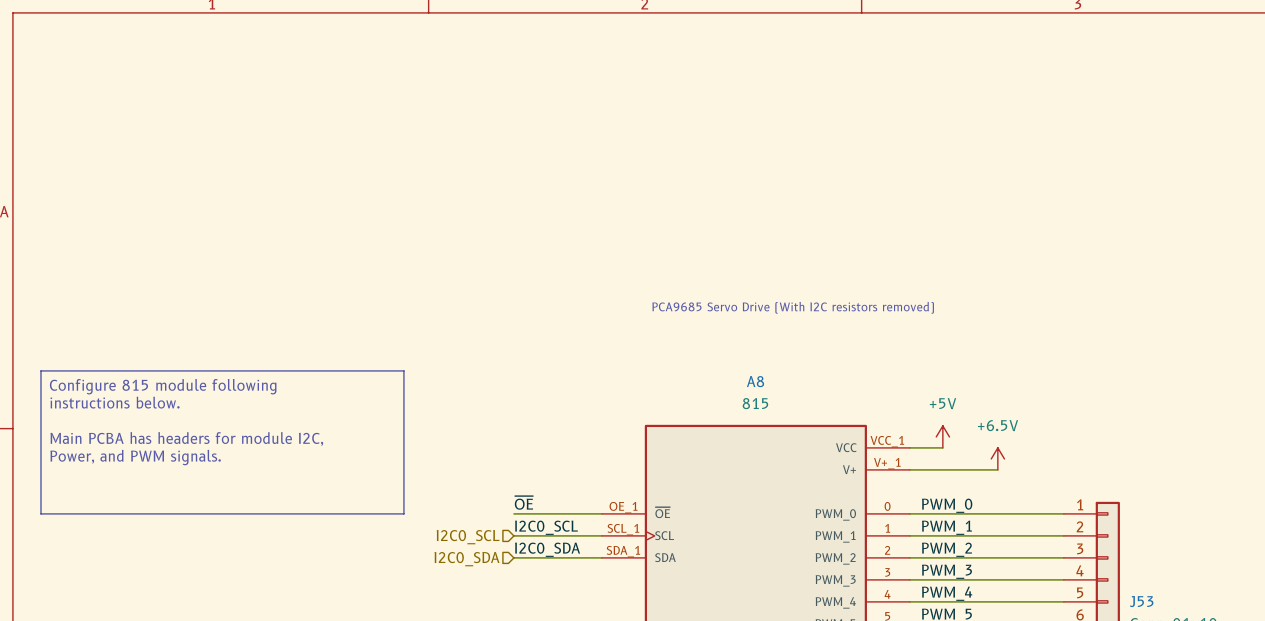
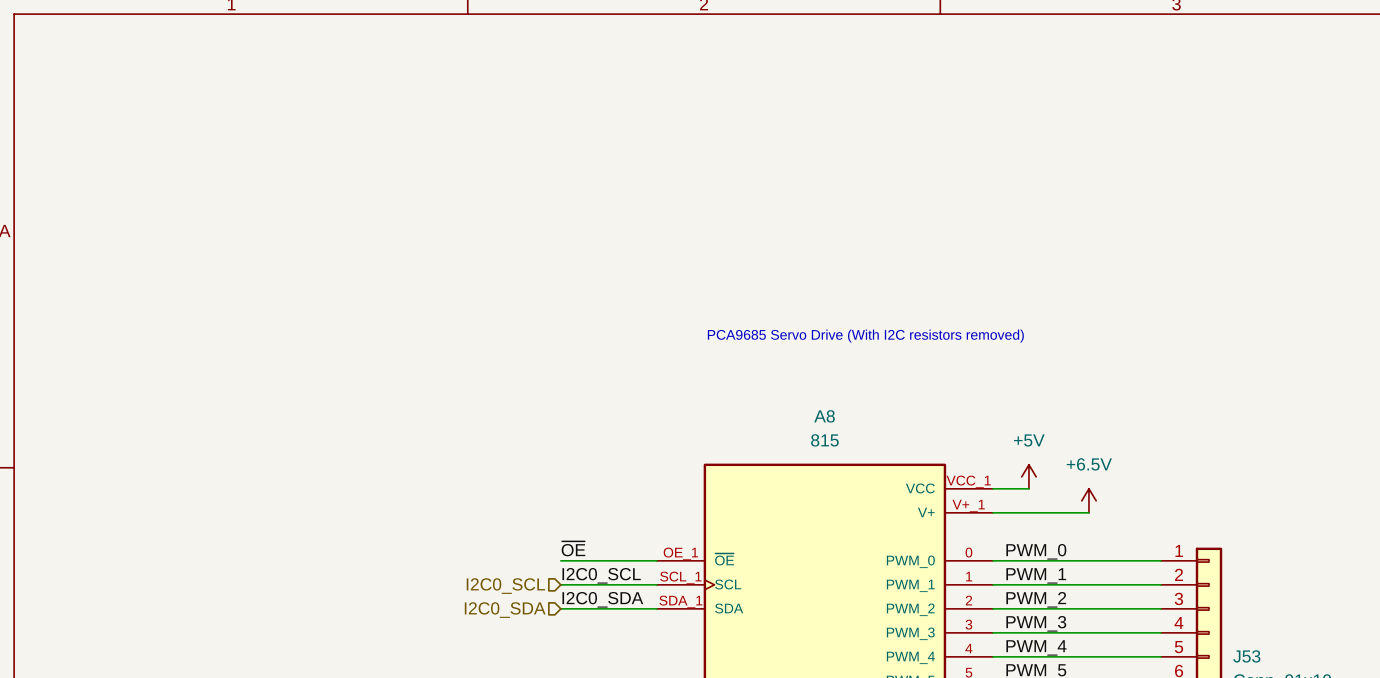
line: (40, 370) (403, 370) (403, 513) (40, 513) (40, 370) -> none
text: Configure 815 module following (163, 386) -> none
text: instructions below. (115, 402) -> none
text: Main PCBA has headers for module I2C, (186, 439) -> none
text: Power, and PWM signals. (135, 457) -> none

